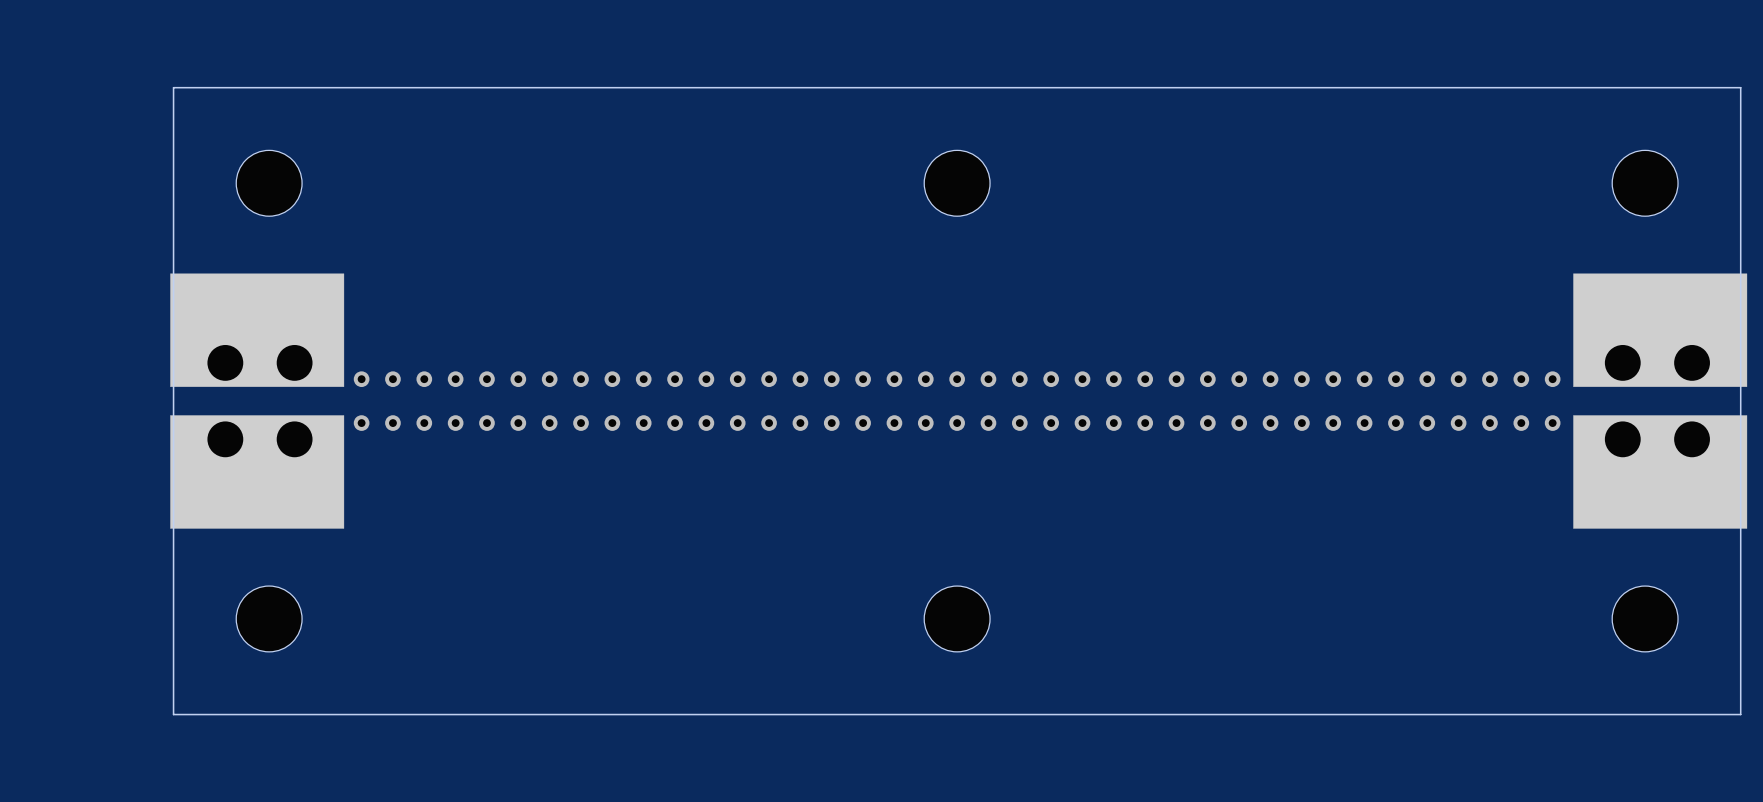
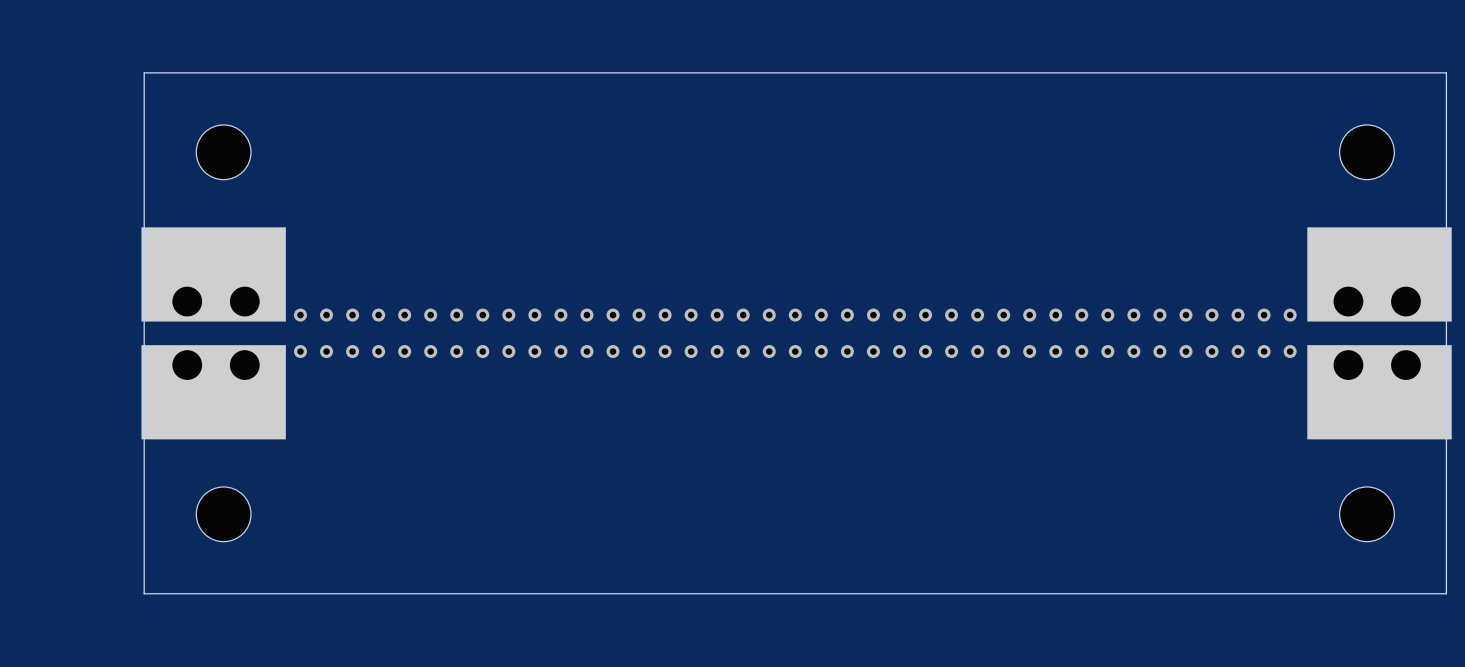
part: (957, 183) -> none
part: (957, 618) -> none

